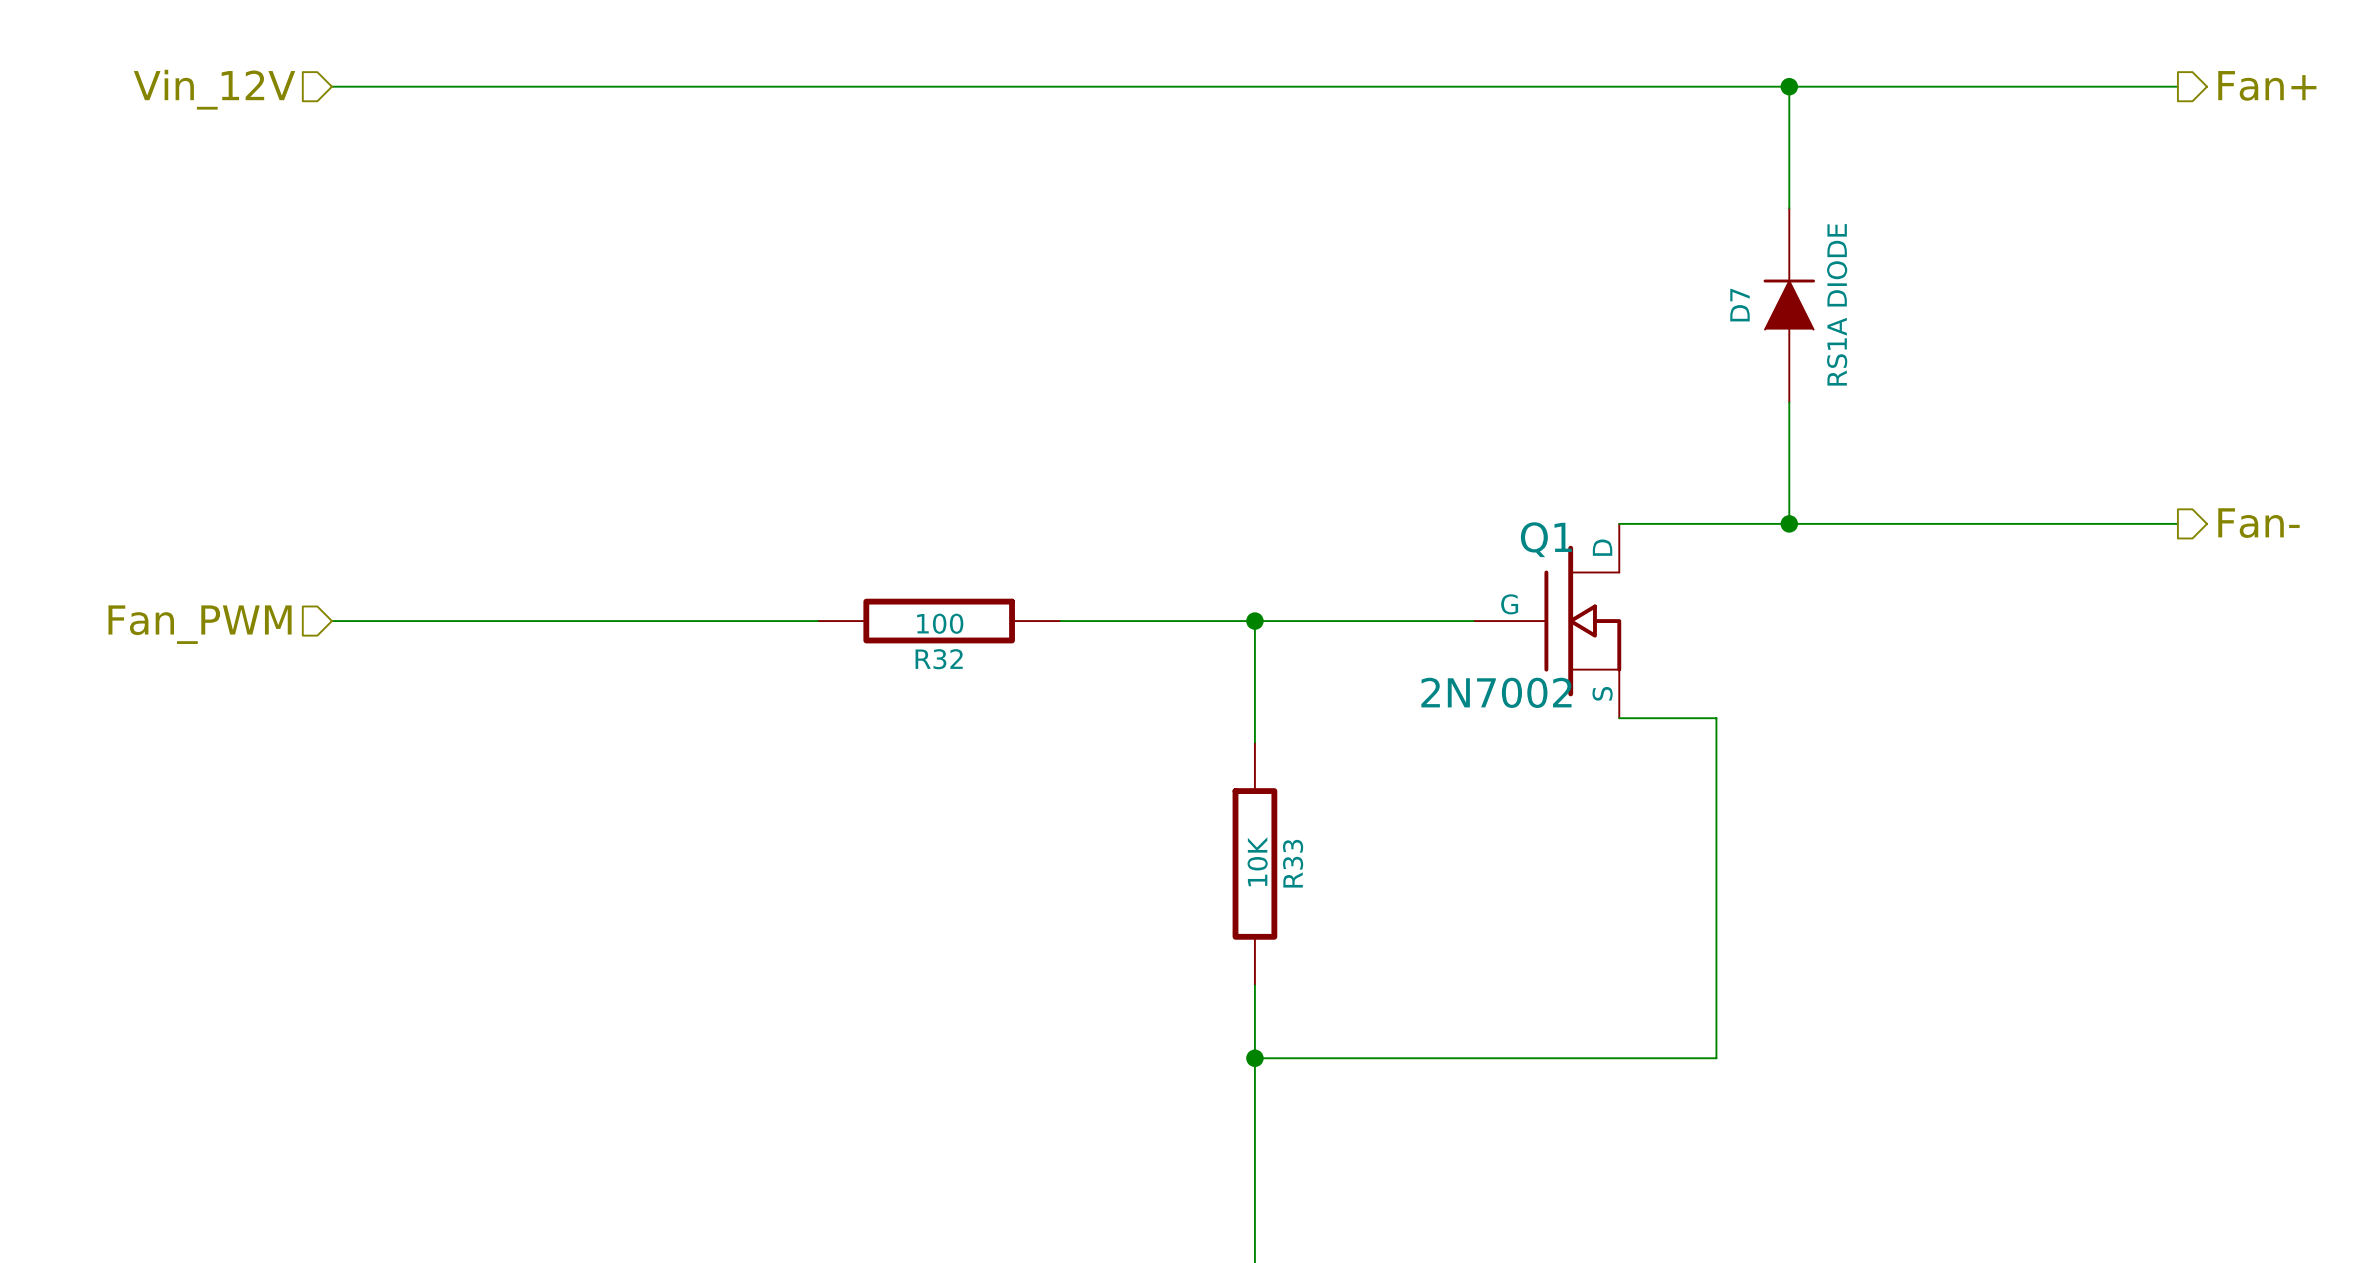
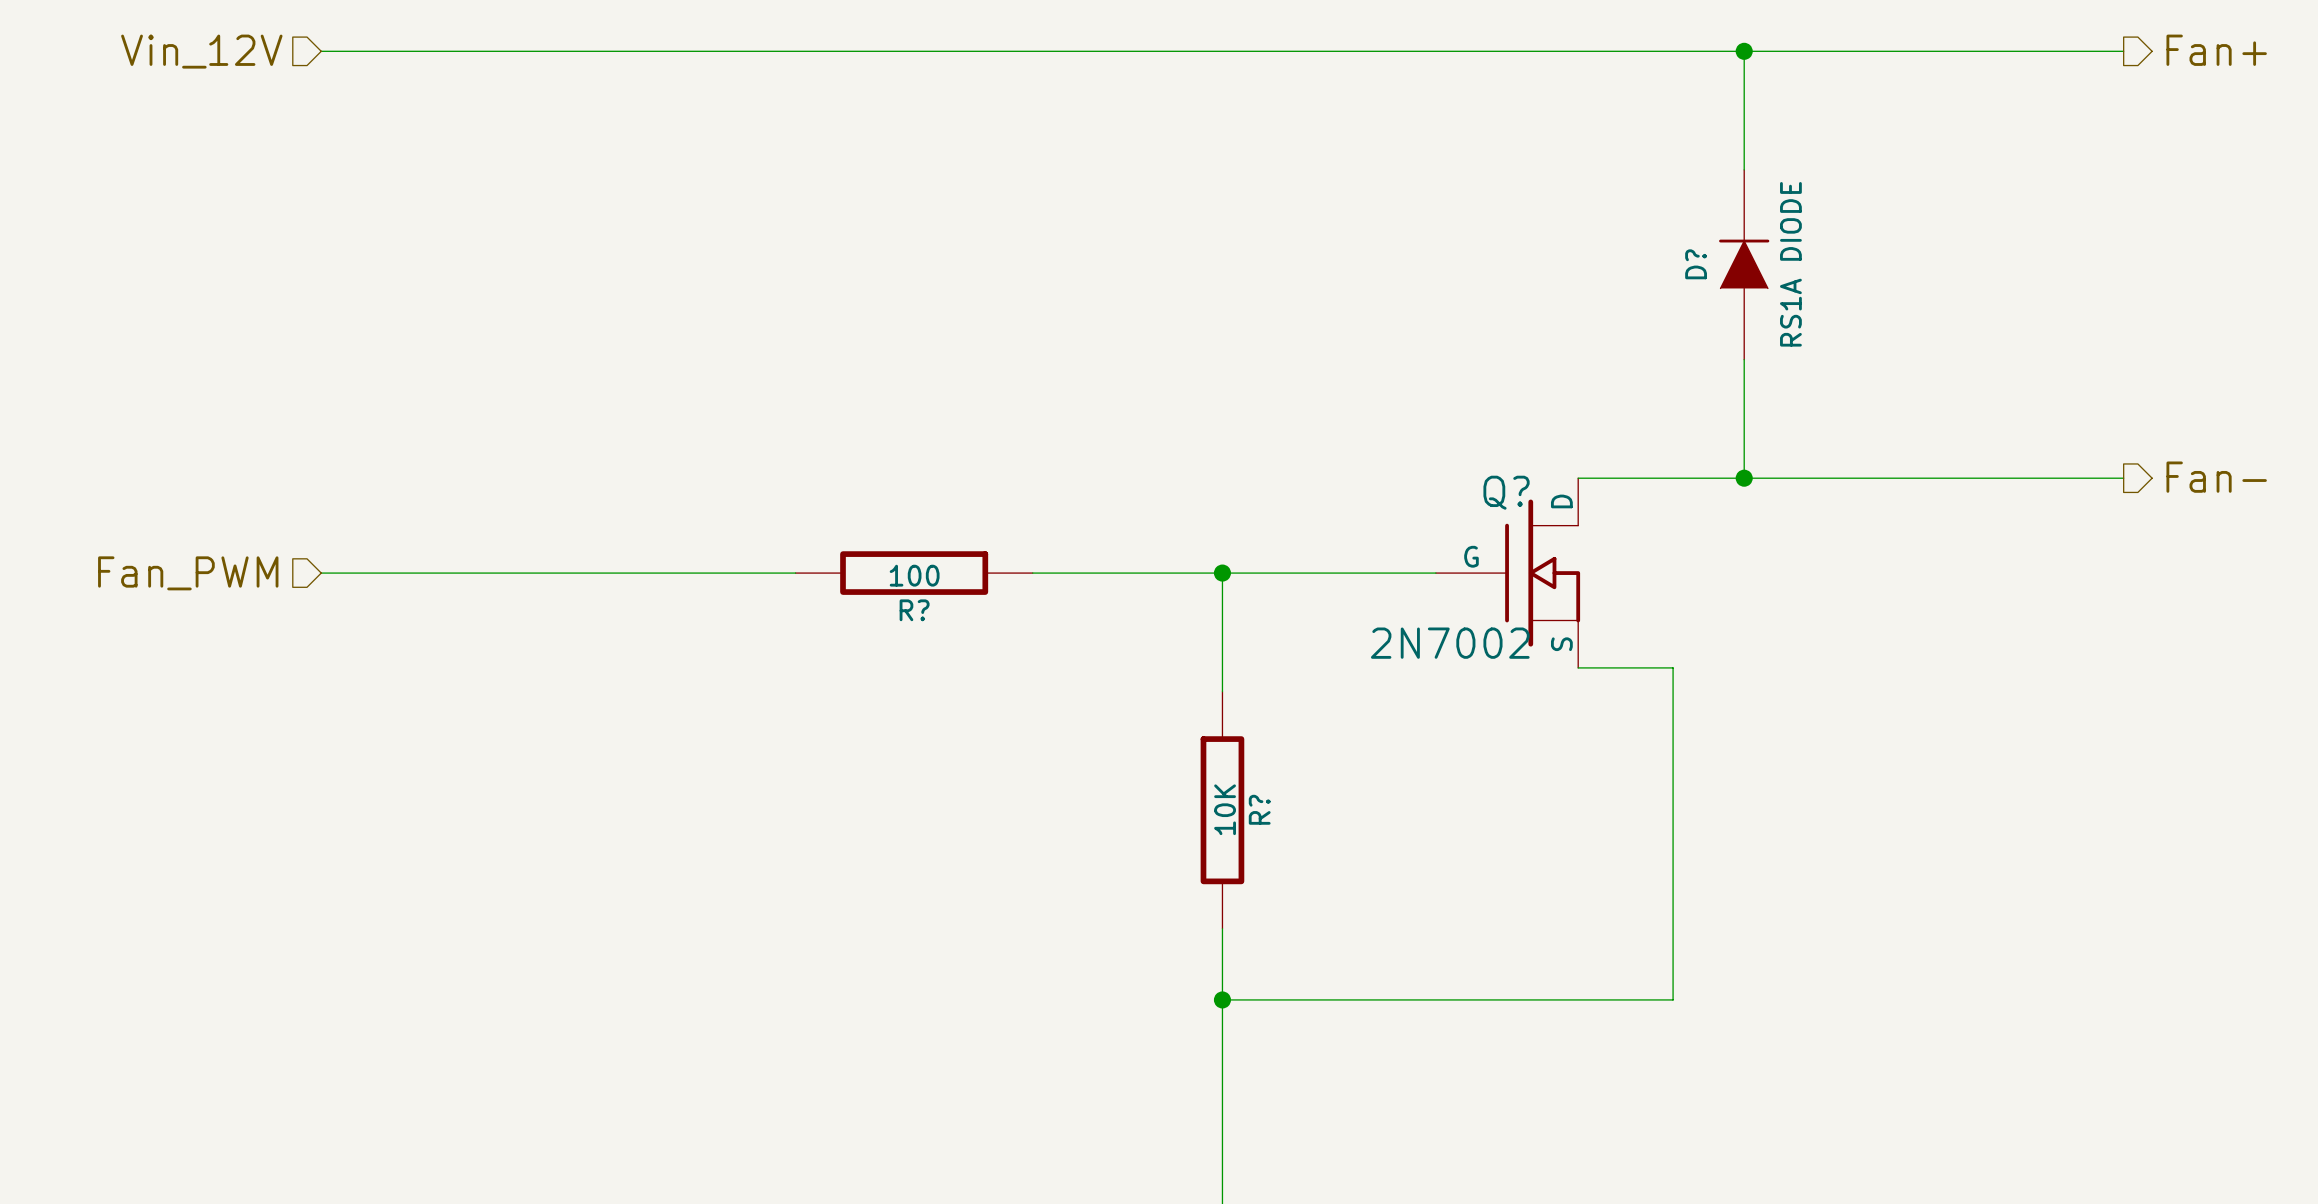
D7 name: D7 (1739, 305) -> D? (1696, 264)
Q1 name: Q1 (1546, 539) -> Q? (1506, 492)
R32 name: R32 (939, 659) -> R? (914, 610)
R33 name: R33 (1293, 863) -> R? (1259, 809)

